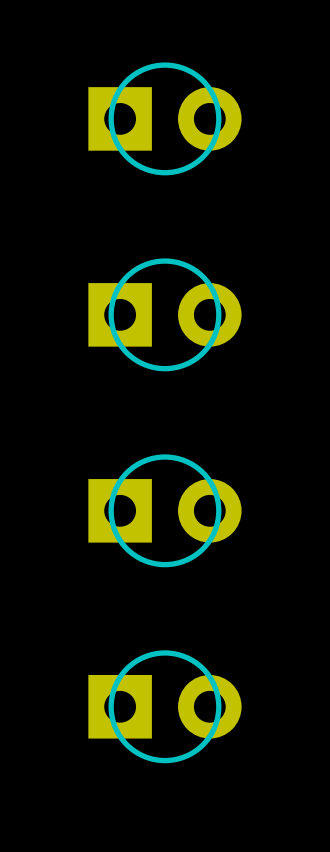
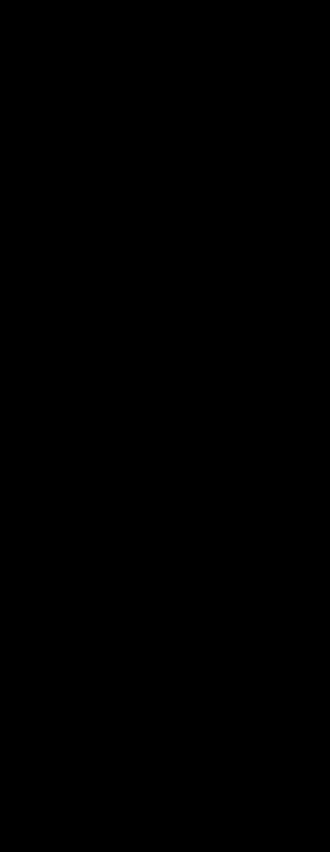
part: (164, 118) -> none
part: (164, 314) -> none
part: (164, 510) -> none
part: (164, 706) -> none

